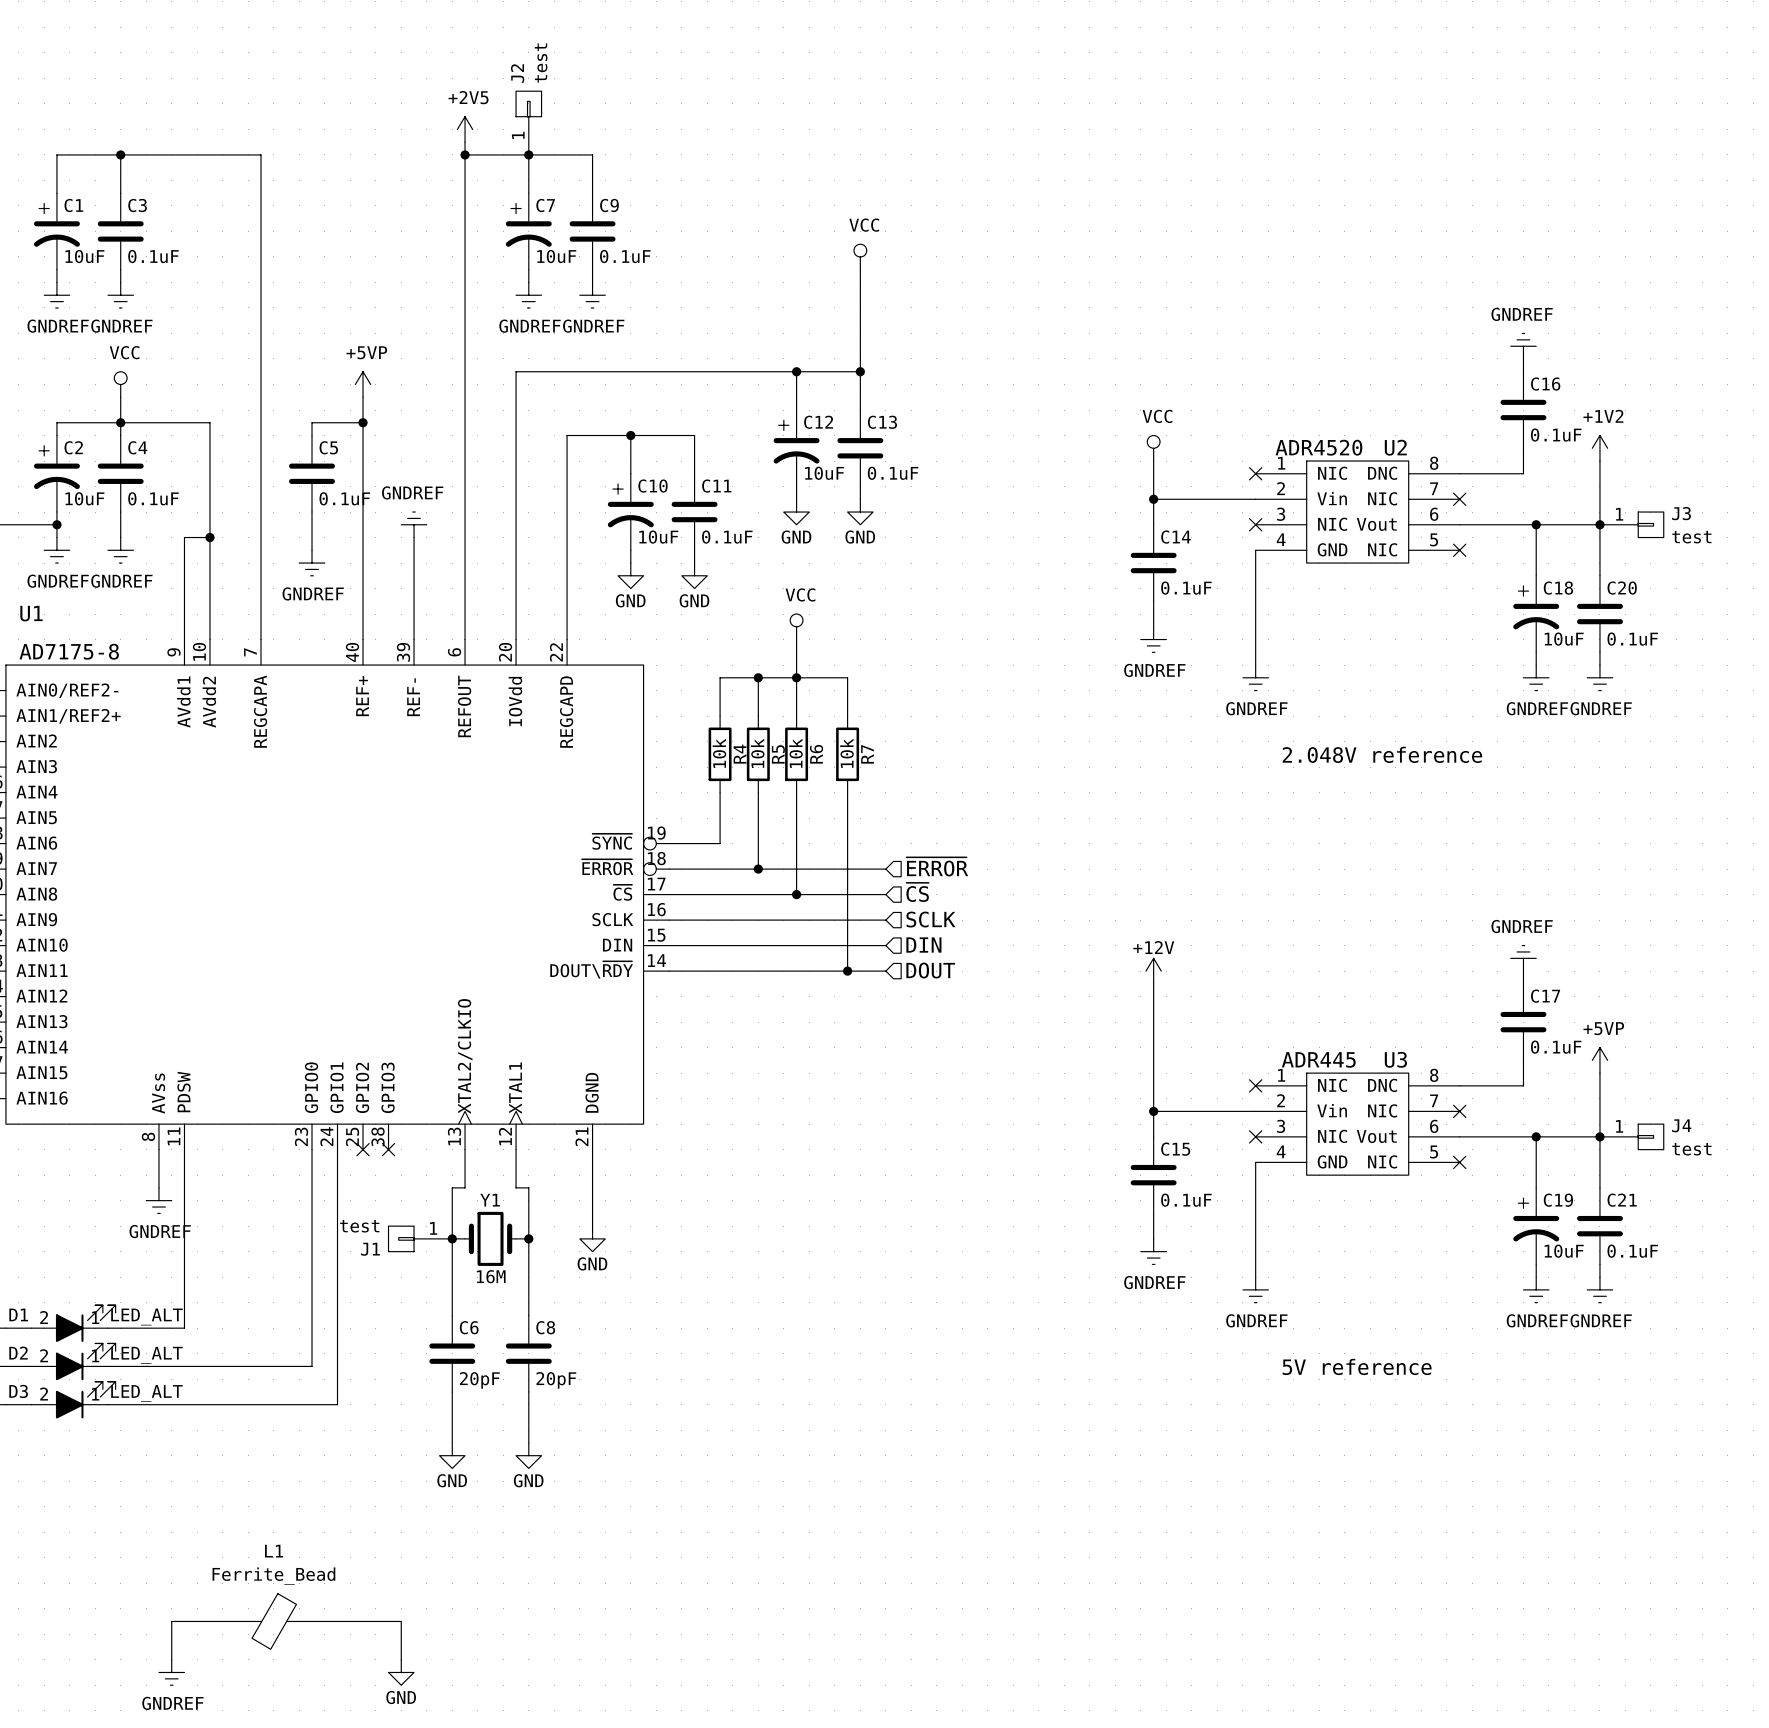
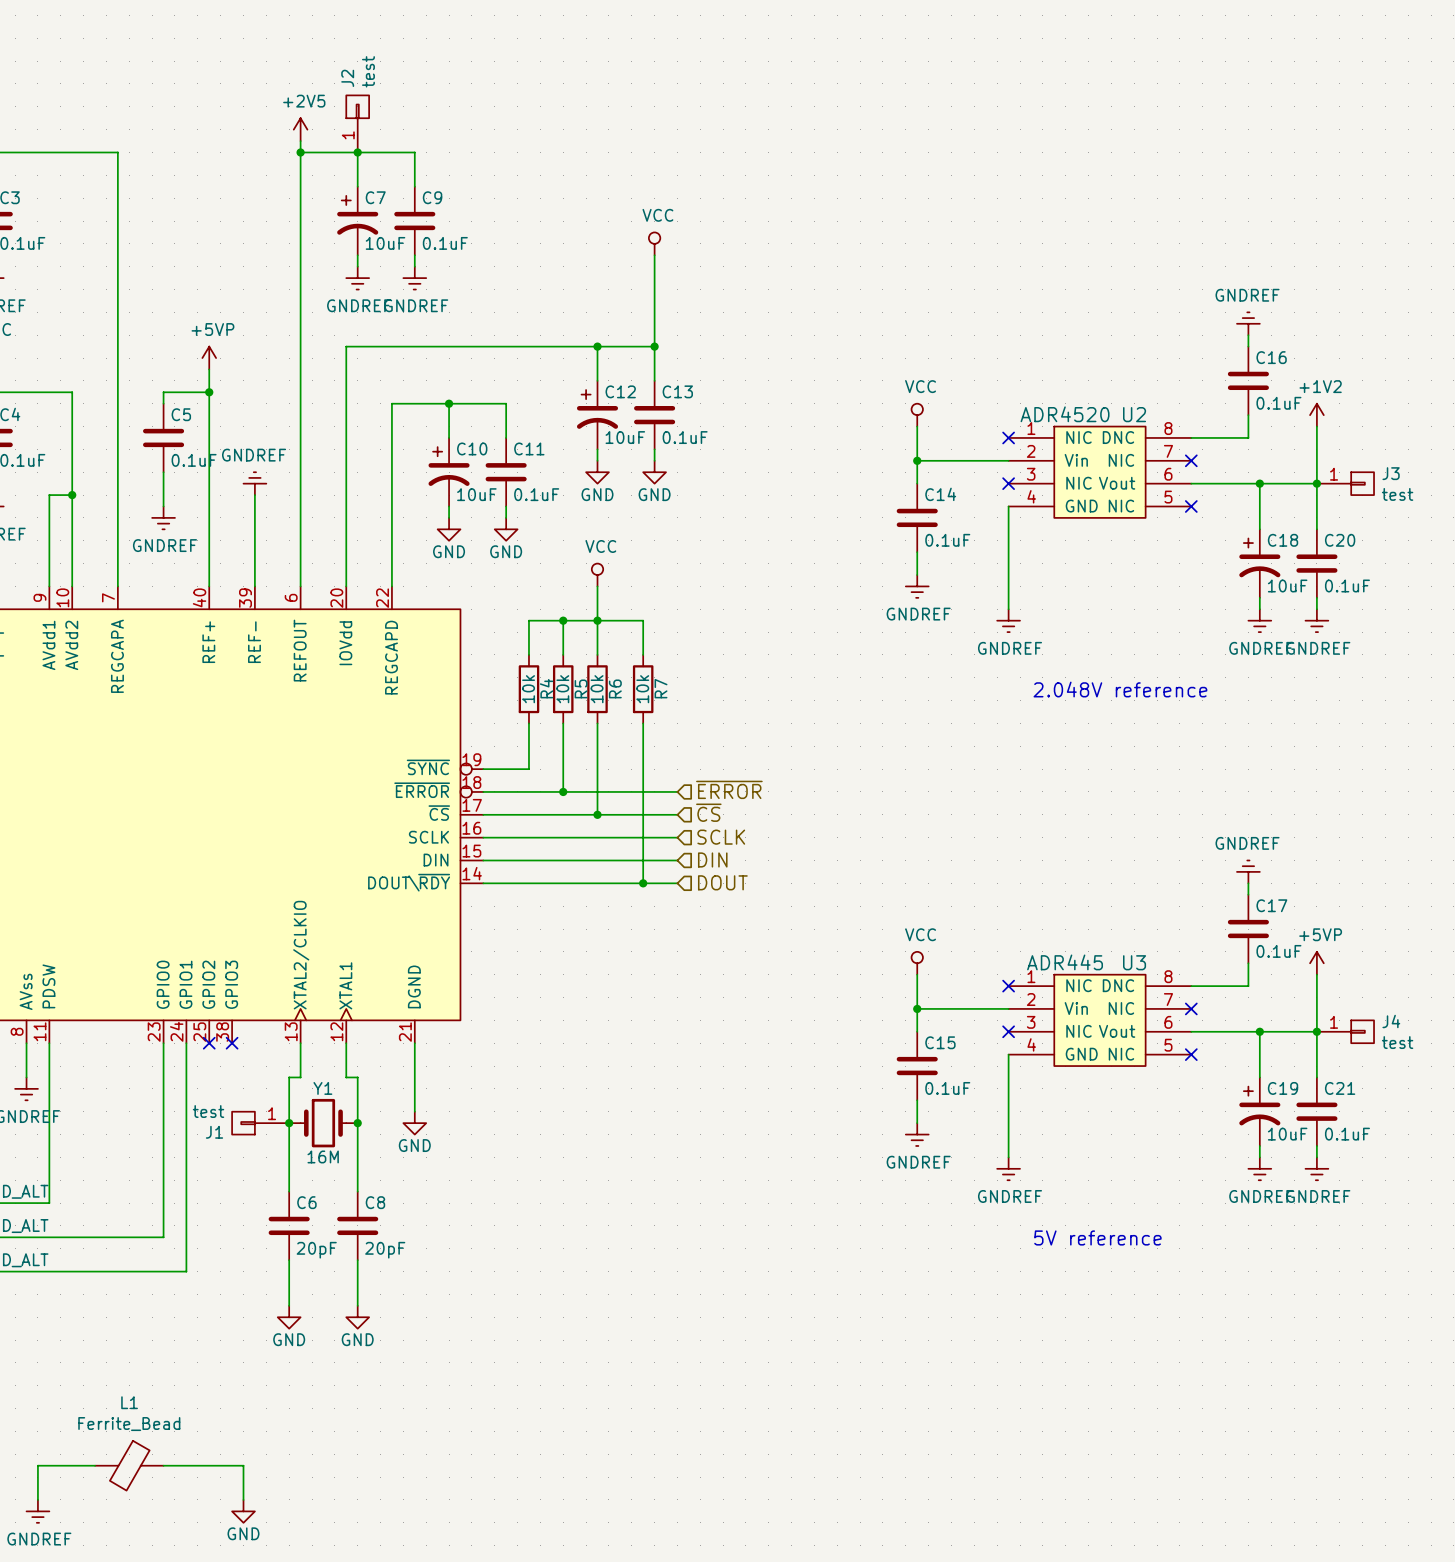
power symbol: +12V (1153, 971) -> none
wire: (1153, 983) (1153, 1073) -> none
power symbol: none -> VCC (917, 963)

